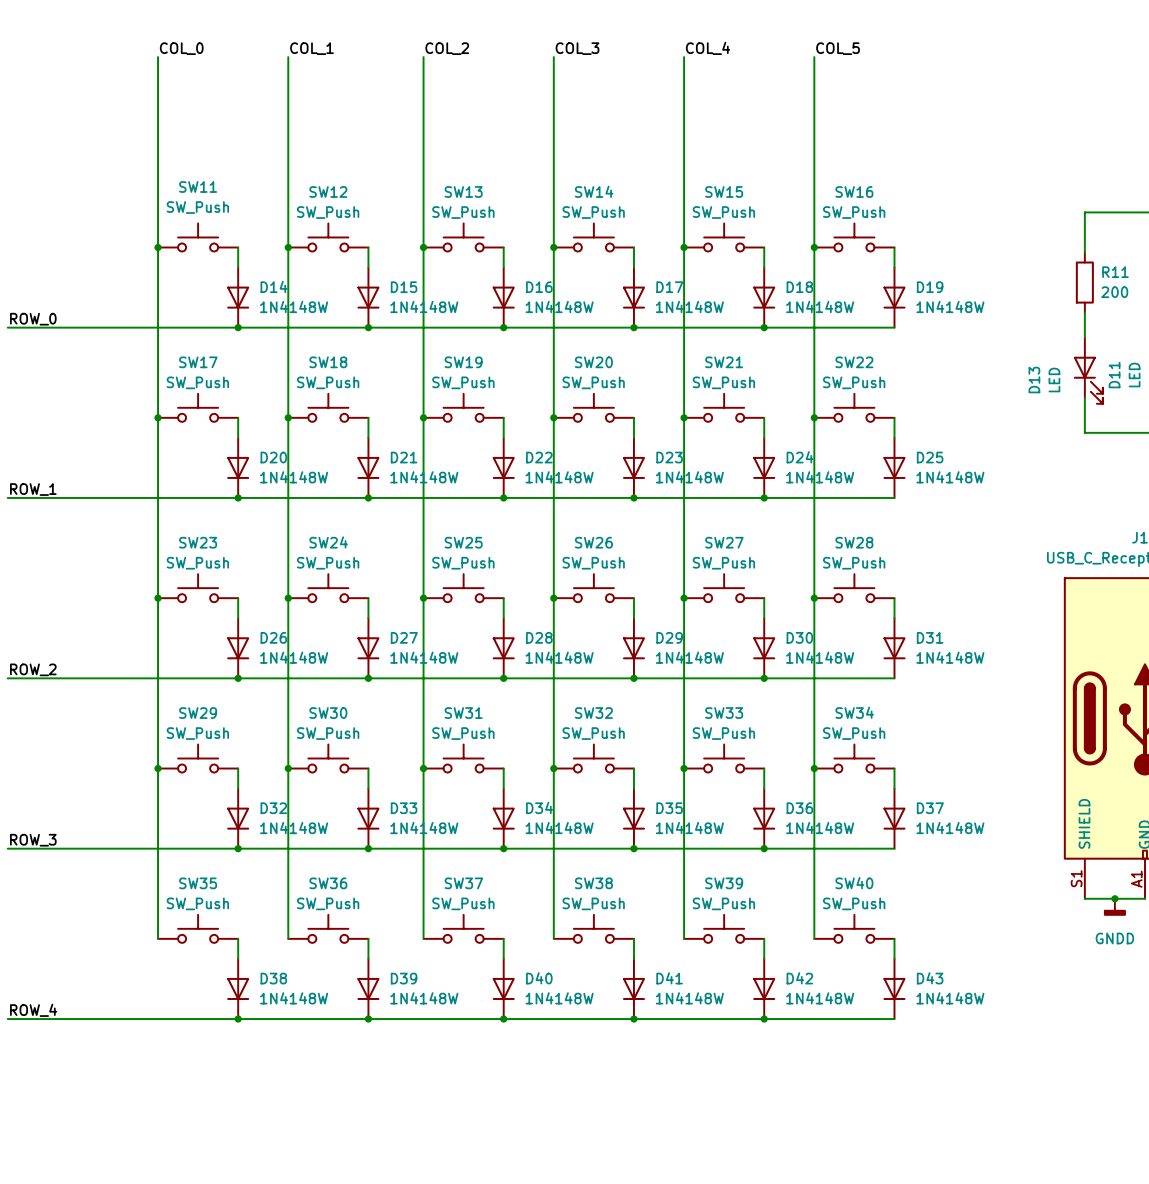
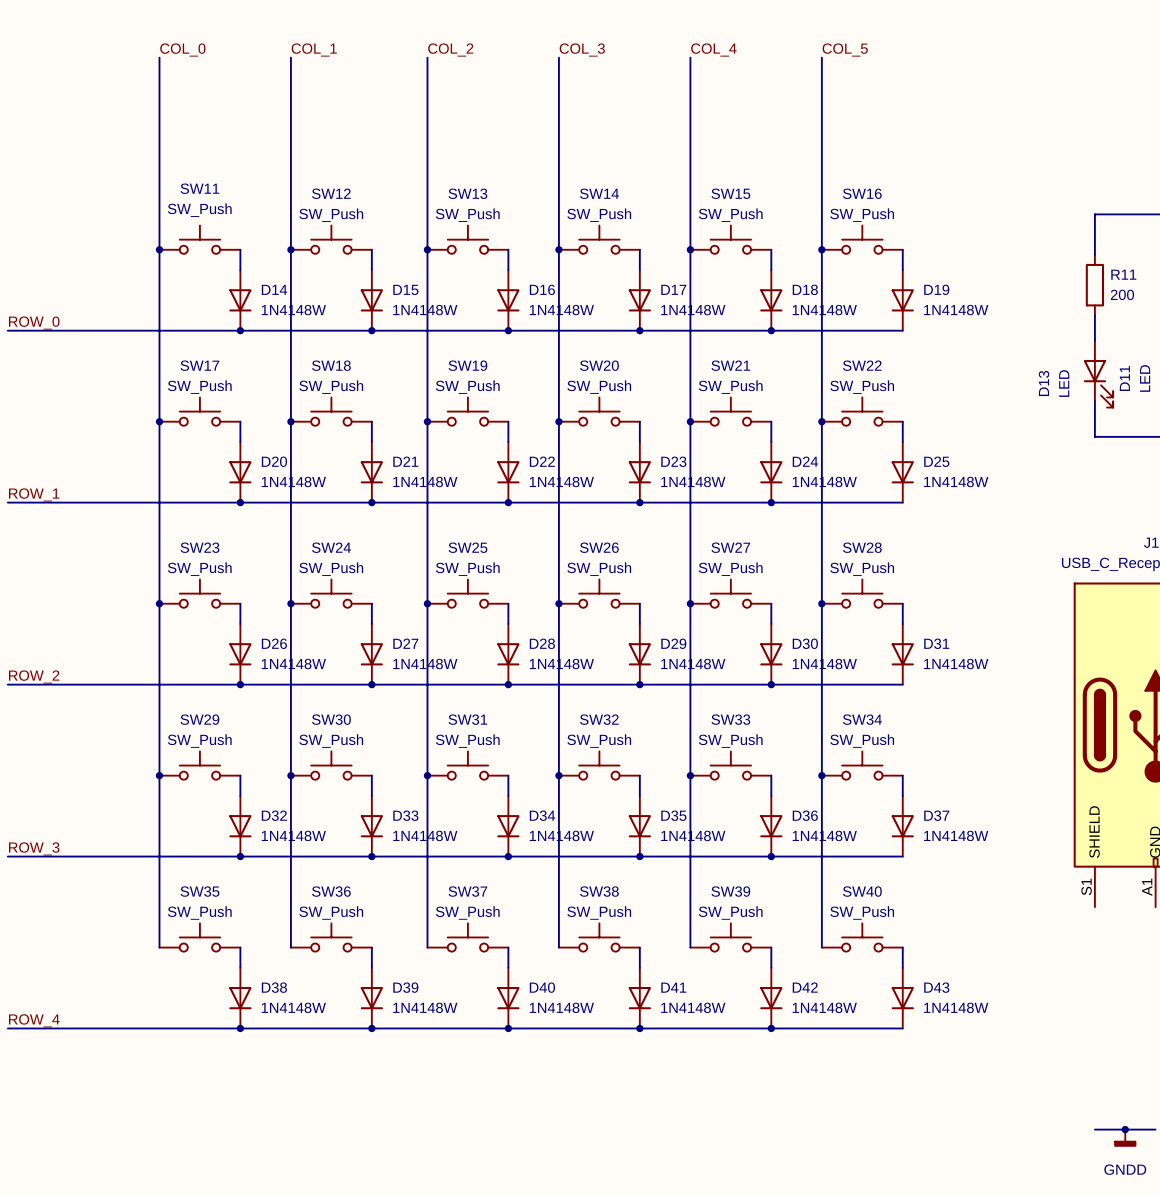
wire: (1084, 898) (1144, 898) -> none
junction: (1114, 898) -> none
power symbol: GNDD (1114, 907) -> none
wire: none -> (1094, 1129) (1155, 1129)
junction: none -> (1125, 1129)
power symbol: none -> GNDD (1125, 1138)

